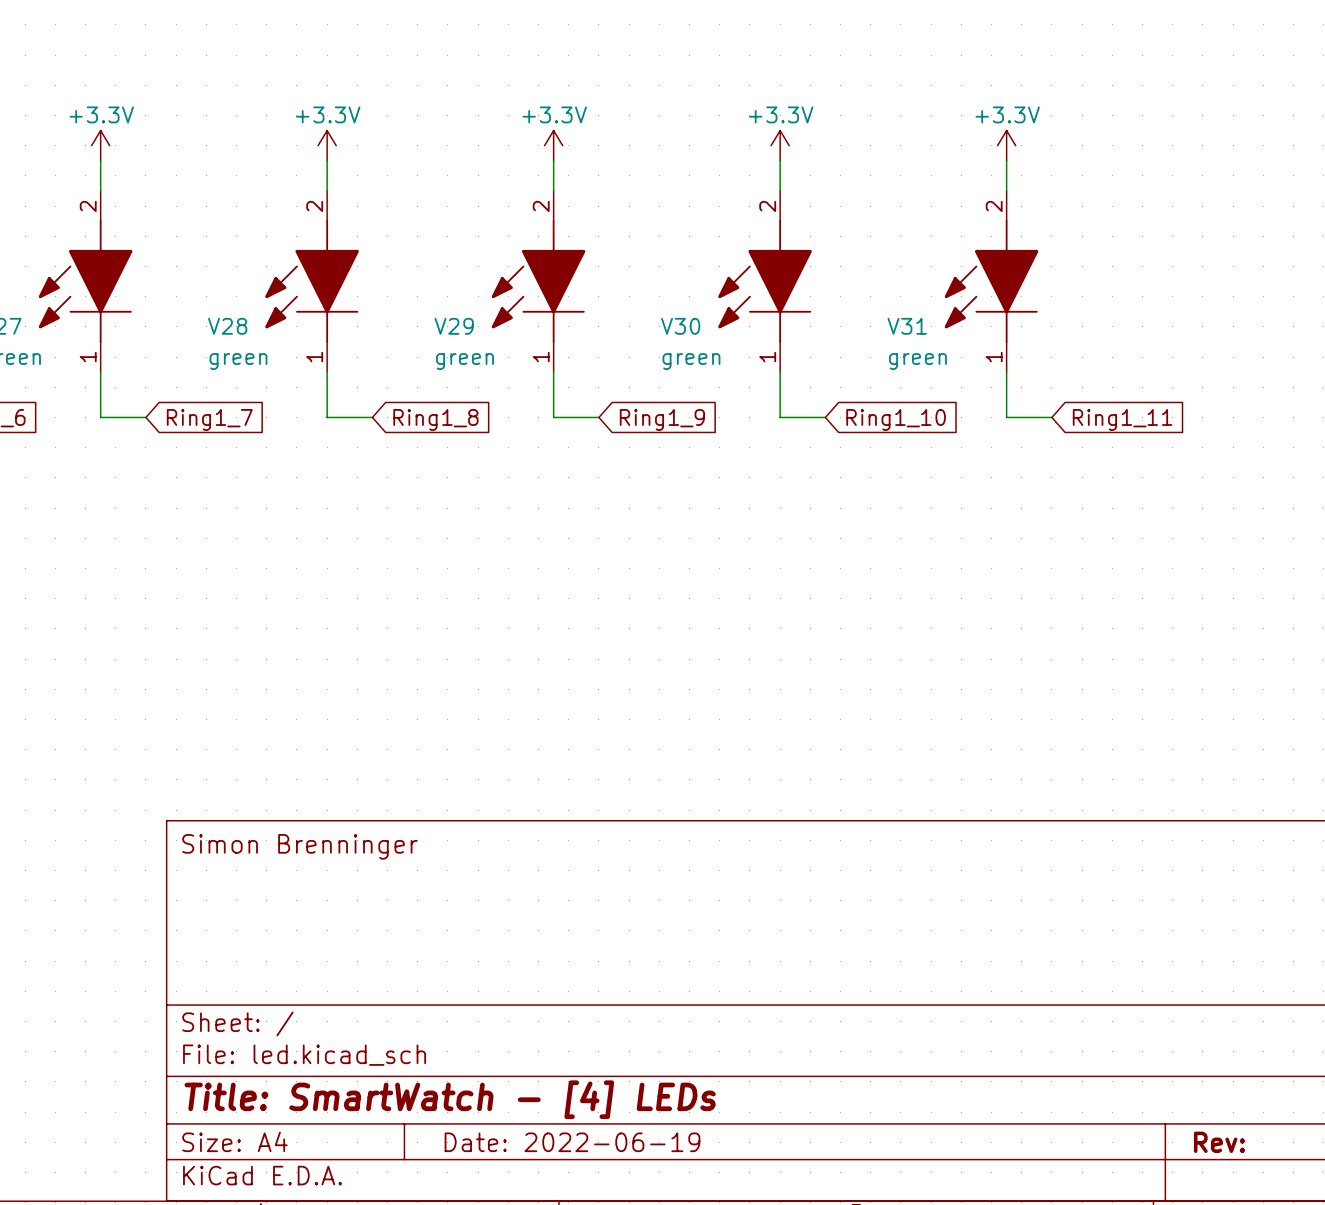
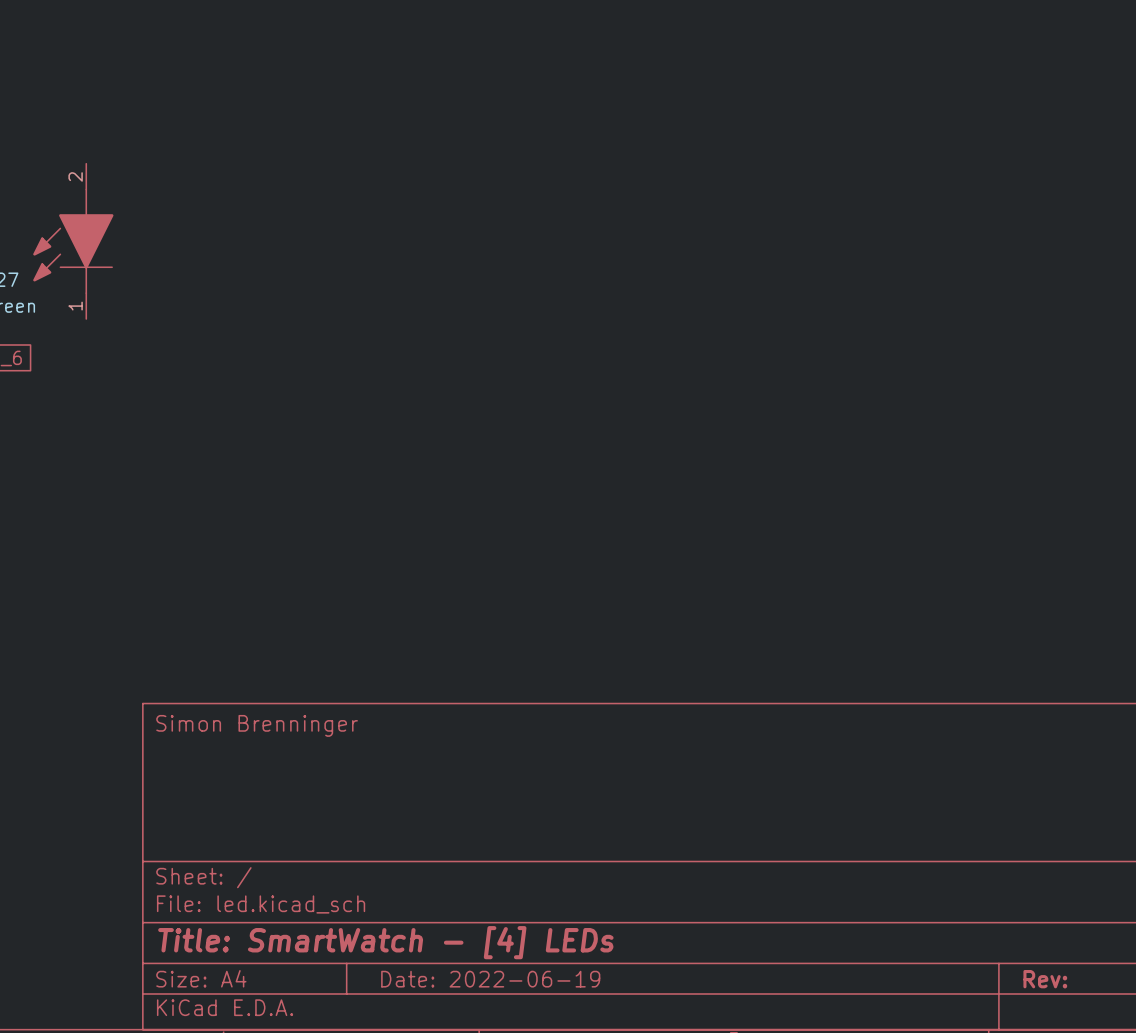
power symbol: +3.3V (100, 145) -> none
power symbol: +3.3V (327, 145) -> none
power symbol: +3.3V (553, 145) -> none
power symbol: +3.3V (780, 145) -> none
power symbol: +3.3V (1006, 145) -> none
wire: (100, 160) (100, 190) -> none
wire: (327, 160) (327, 190) -> none
wire: (553, 160) (553, 190) -> none
wire: (780, 160) (780, 190) -> none
wire: (1006, 160) (1006, 190) -> none
V28: green (312, 281) -> none
V29: green (538, 281) -> none
V30: green (765, 281) -> none
V31: green (991, 281) -> none
wire: (100, 372) (100, 417) (145, 417) -> none
wire: (327, 372) (327, 417) (372, 417) -> none
wire: (553, 372) (553, 417) (598, 417) -> none
wire: (780, 372) (780, 417) (825, 417) -> none
wire: (1006, 372) (1006, 417) (1051, 417) -> none
global label: Ring1_7 (209, 419) -> none
global label: Ring1_8 (435, 419) -> none
global label: Ring1_9 (662, 419) -> none
global label: Ring1_10 (896, 419) -> none
global label: Ring1_11 (1122, 419) -> none

